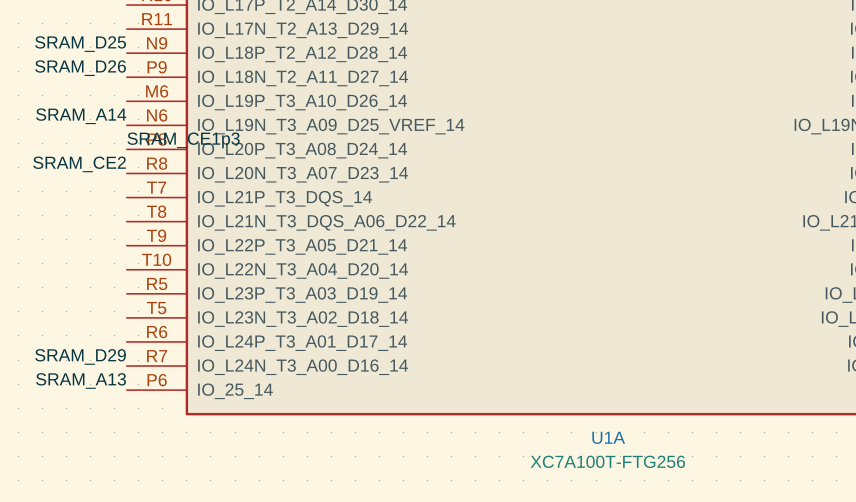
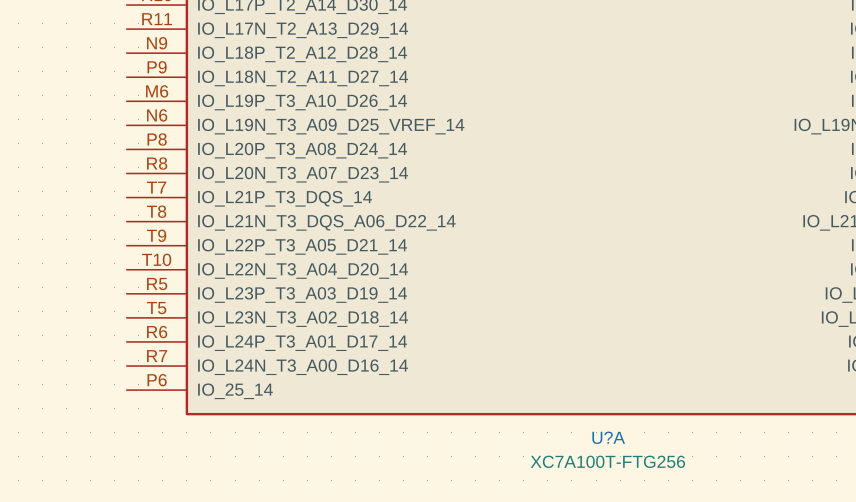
label: SRAM_D25 (80, 44) -> none
label: SRAM_D26 (80, 68) -> none
label: SRAM_A14 (81, 116) -> none
label: SRAM_CE1p3 (183, 140) -> none
label: SRAM_CE2 (79, 164) -> none
label: SRAM_D29 (80, 356) -> none
label: SRAM_A13 (81, 381) -> none
U1A name: U1A (608, 437) -> U?A (608, 437)

